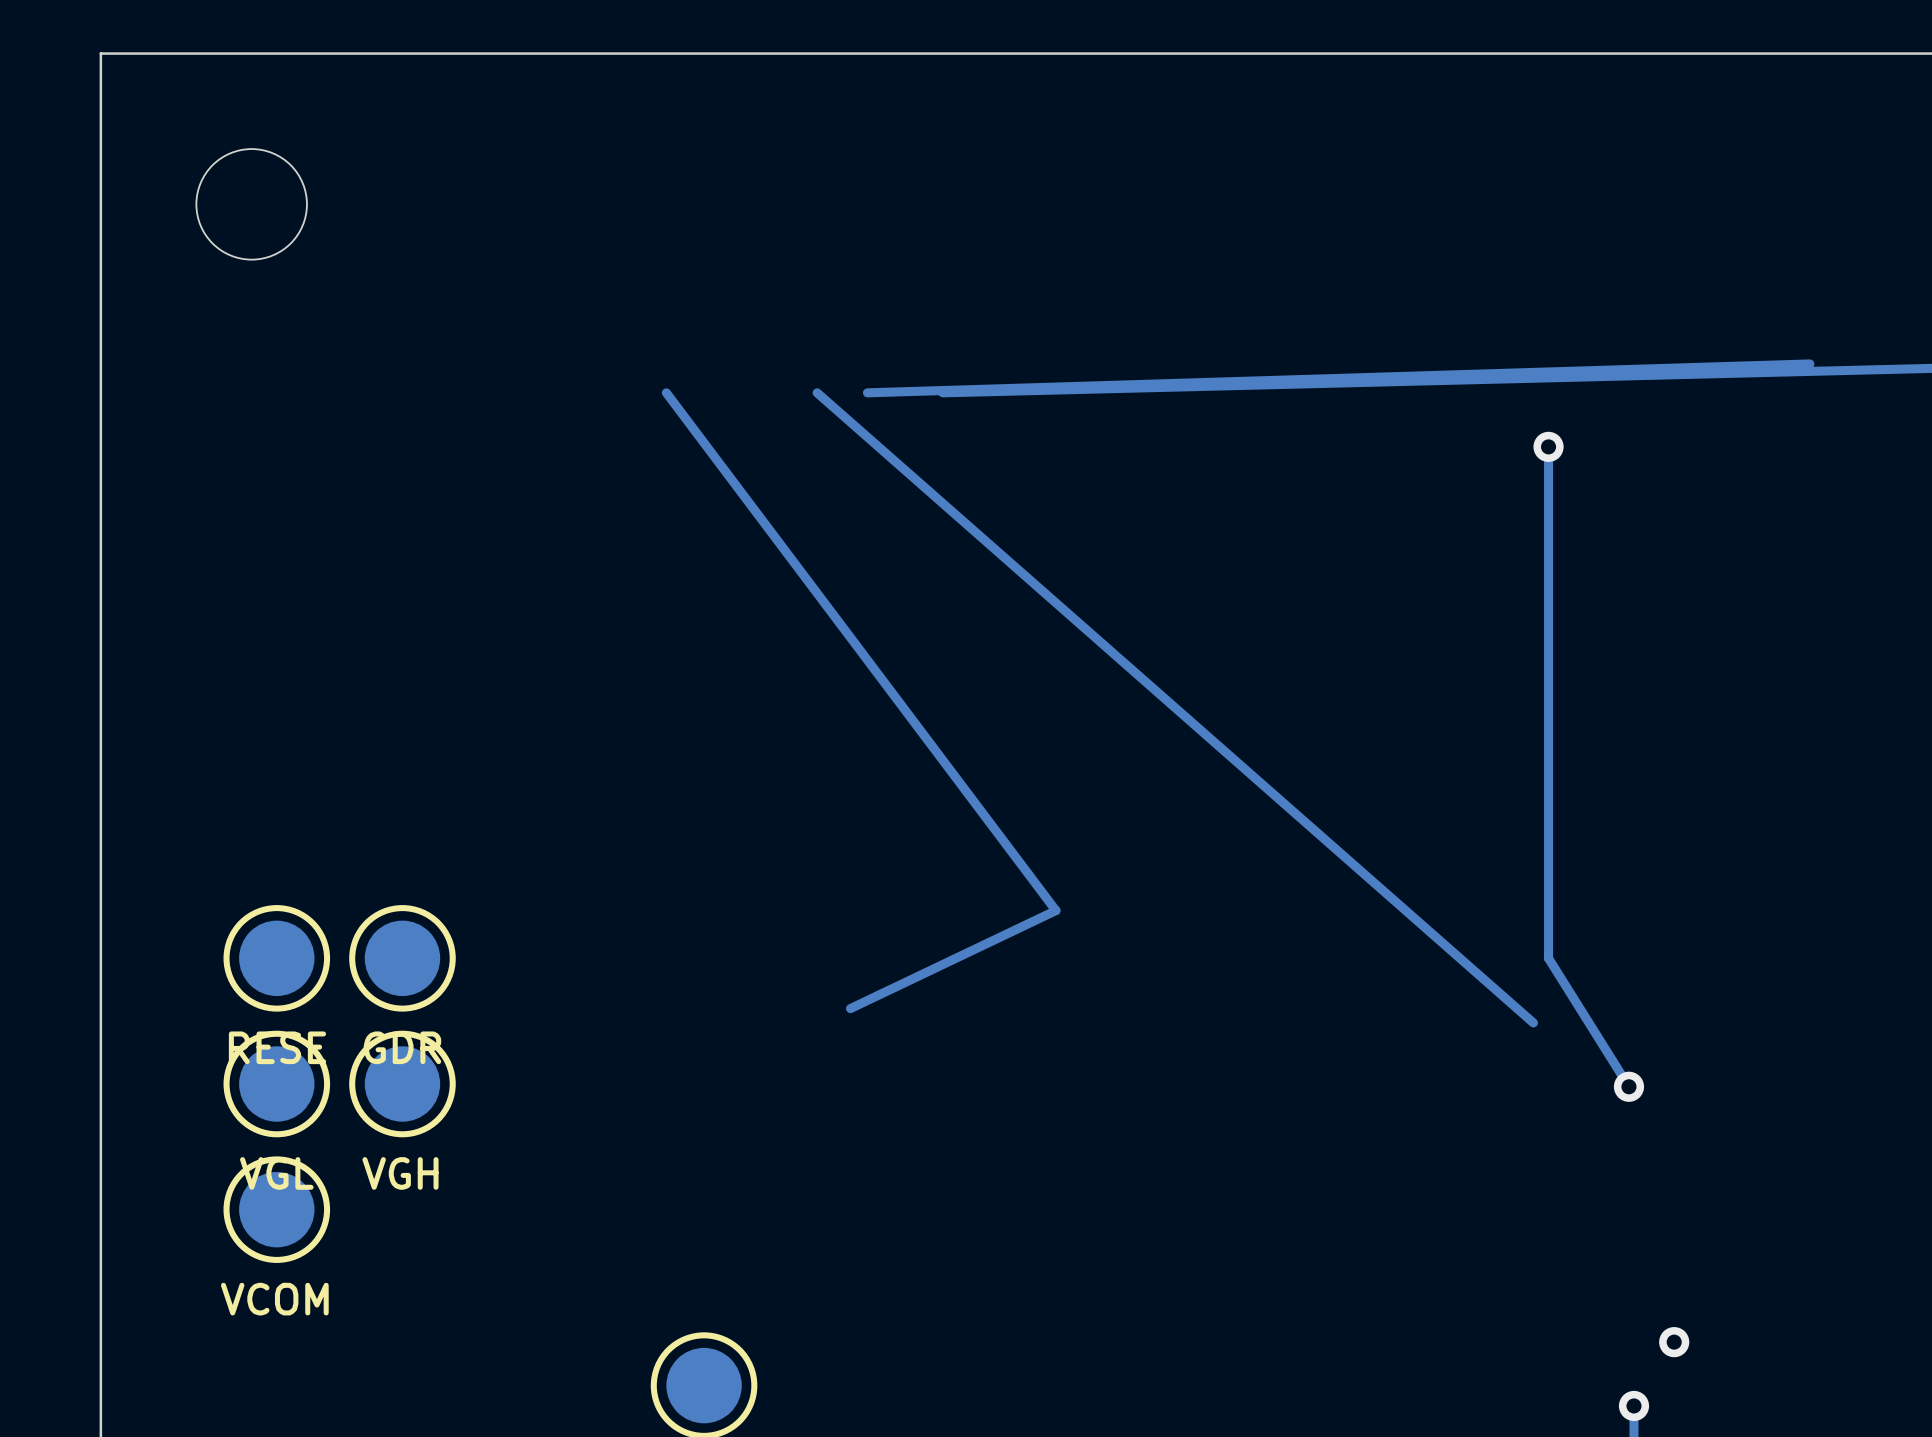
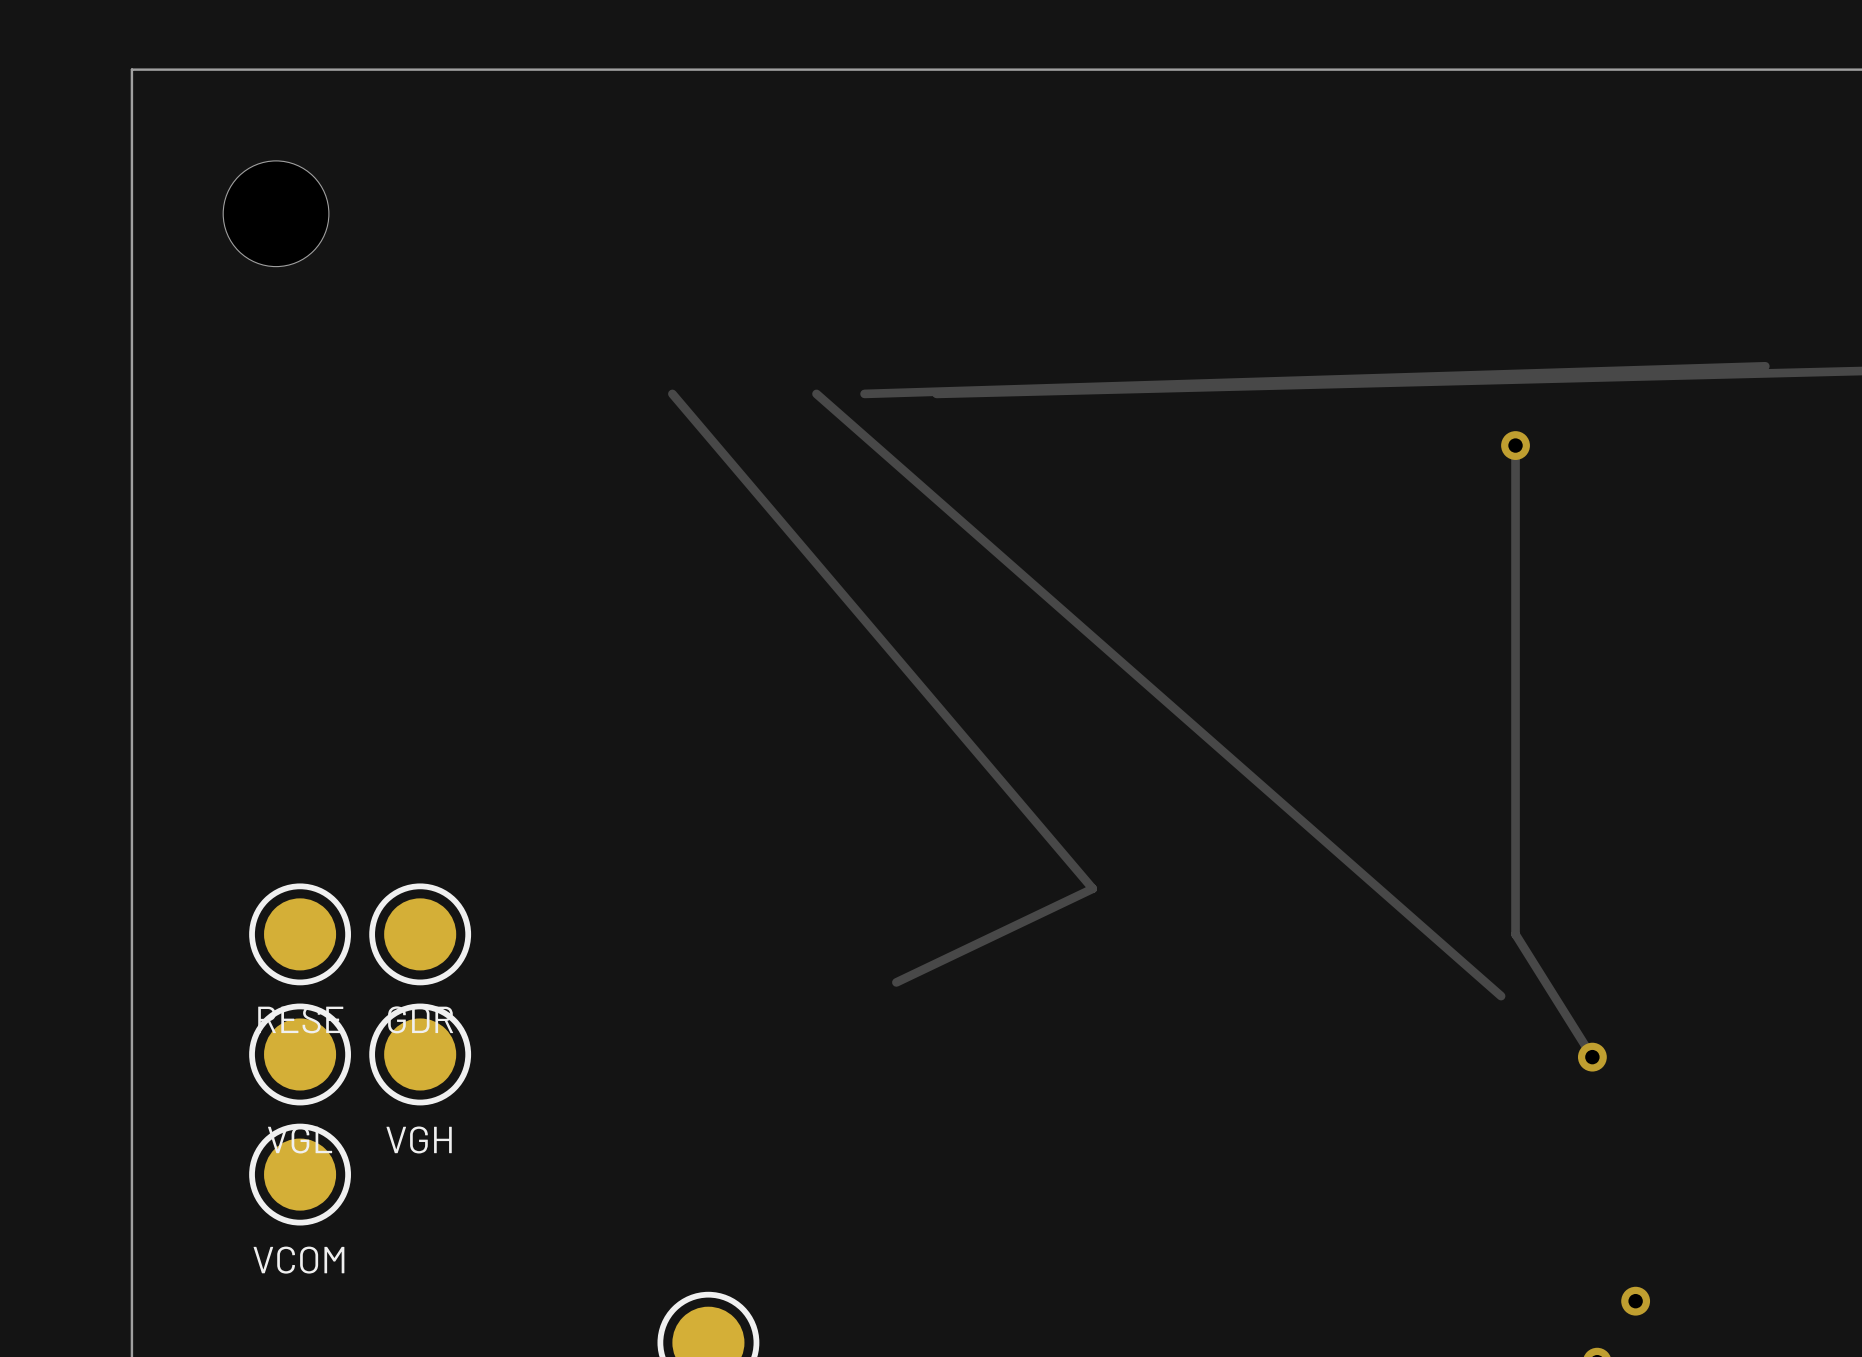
track: (666, 392) (1055, 910) (850, 1008) -> (672, 393) (1092, 888) (896, 982)

